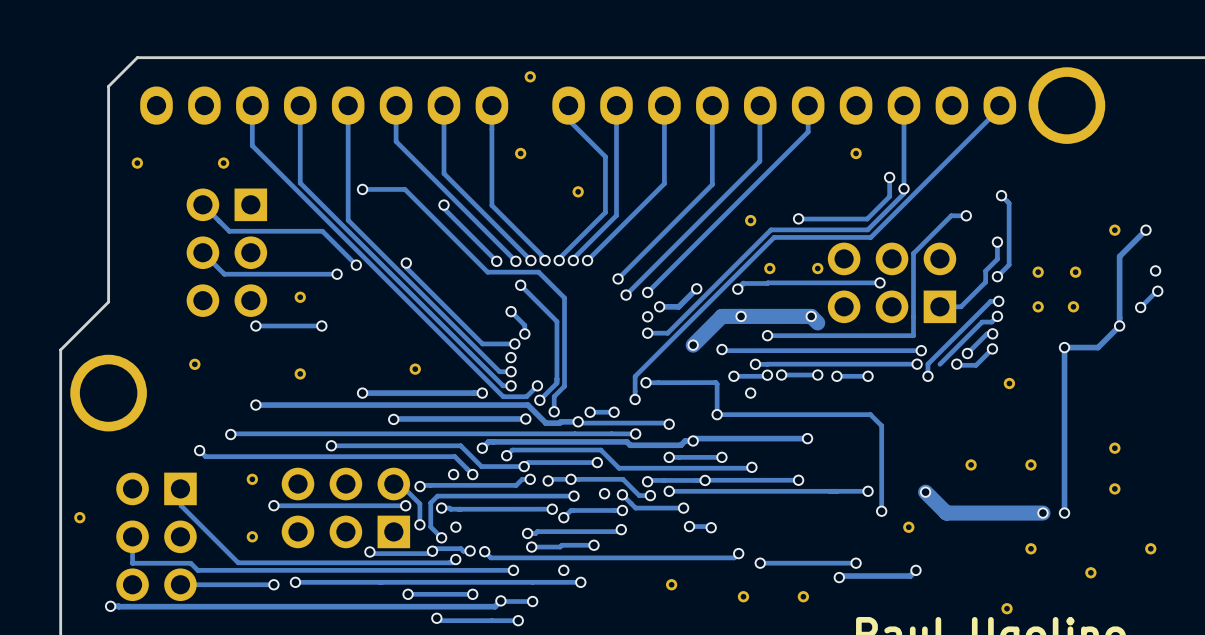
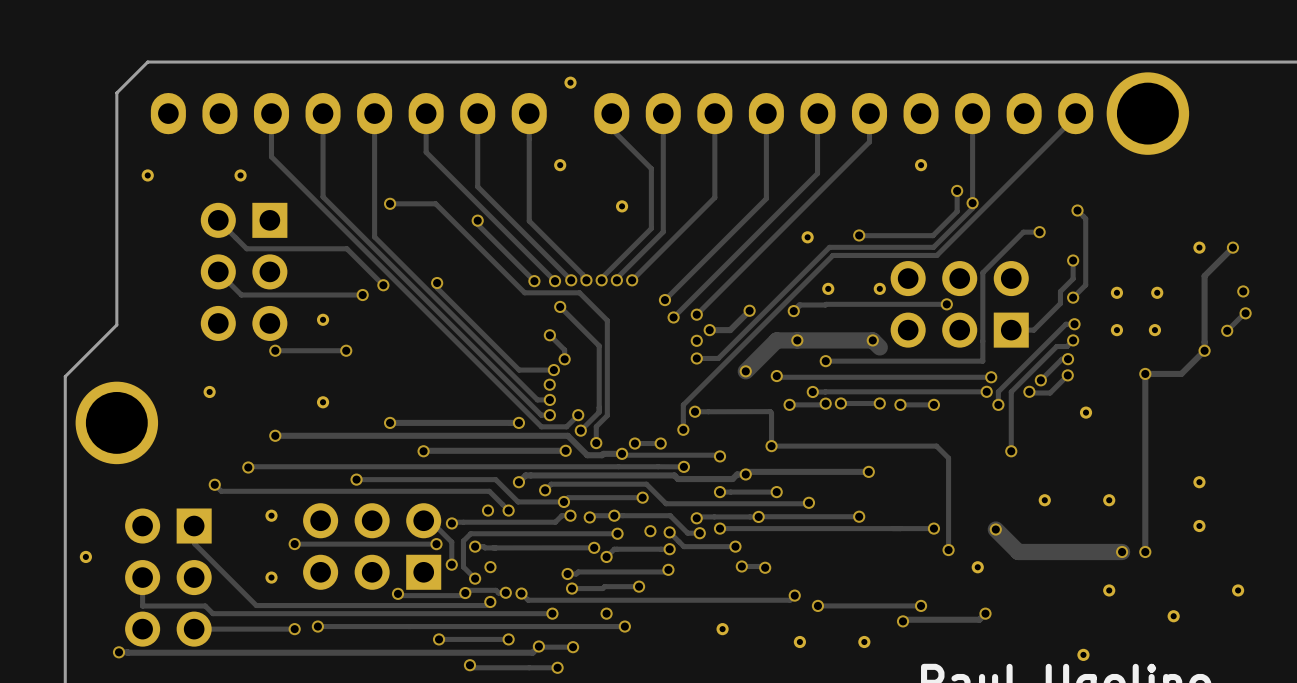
track: none -> (1011, 391) (1011, 451)
part: (415, 369) -> none
via: (750, 393) -> none
via: none -> (1011, 451)

